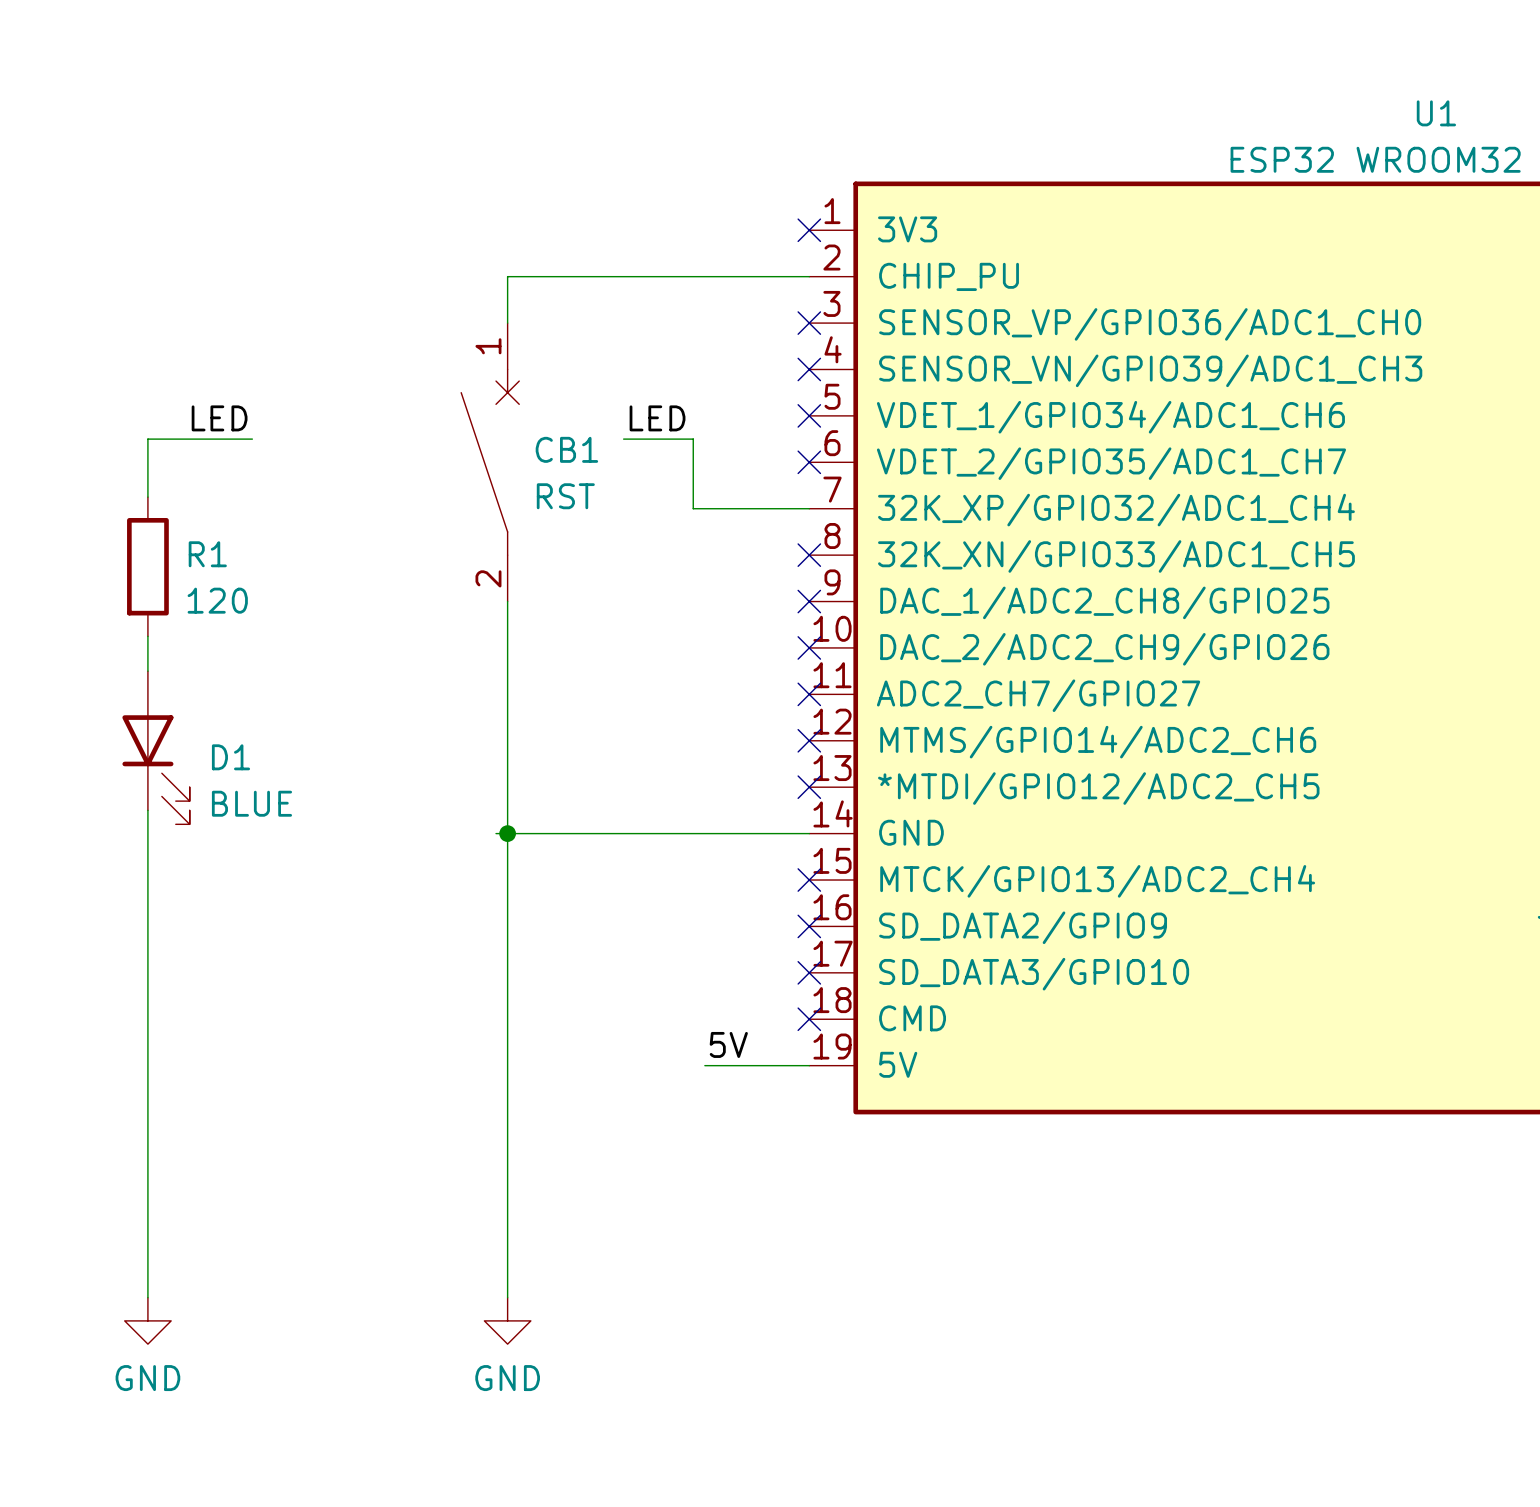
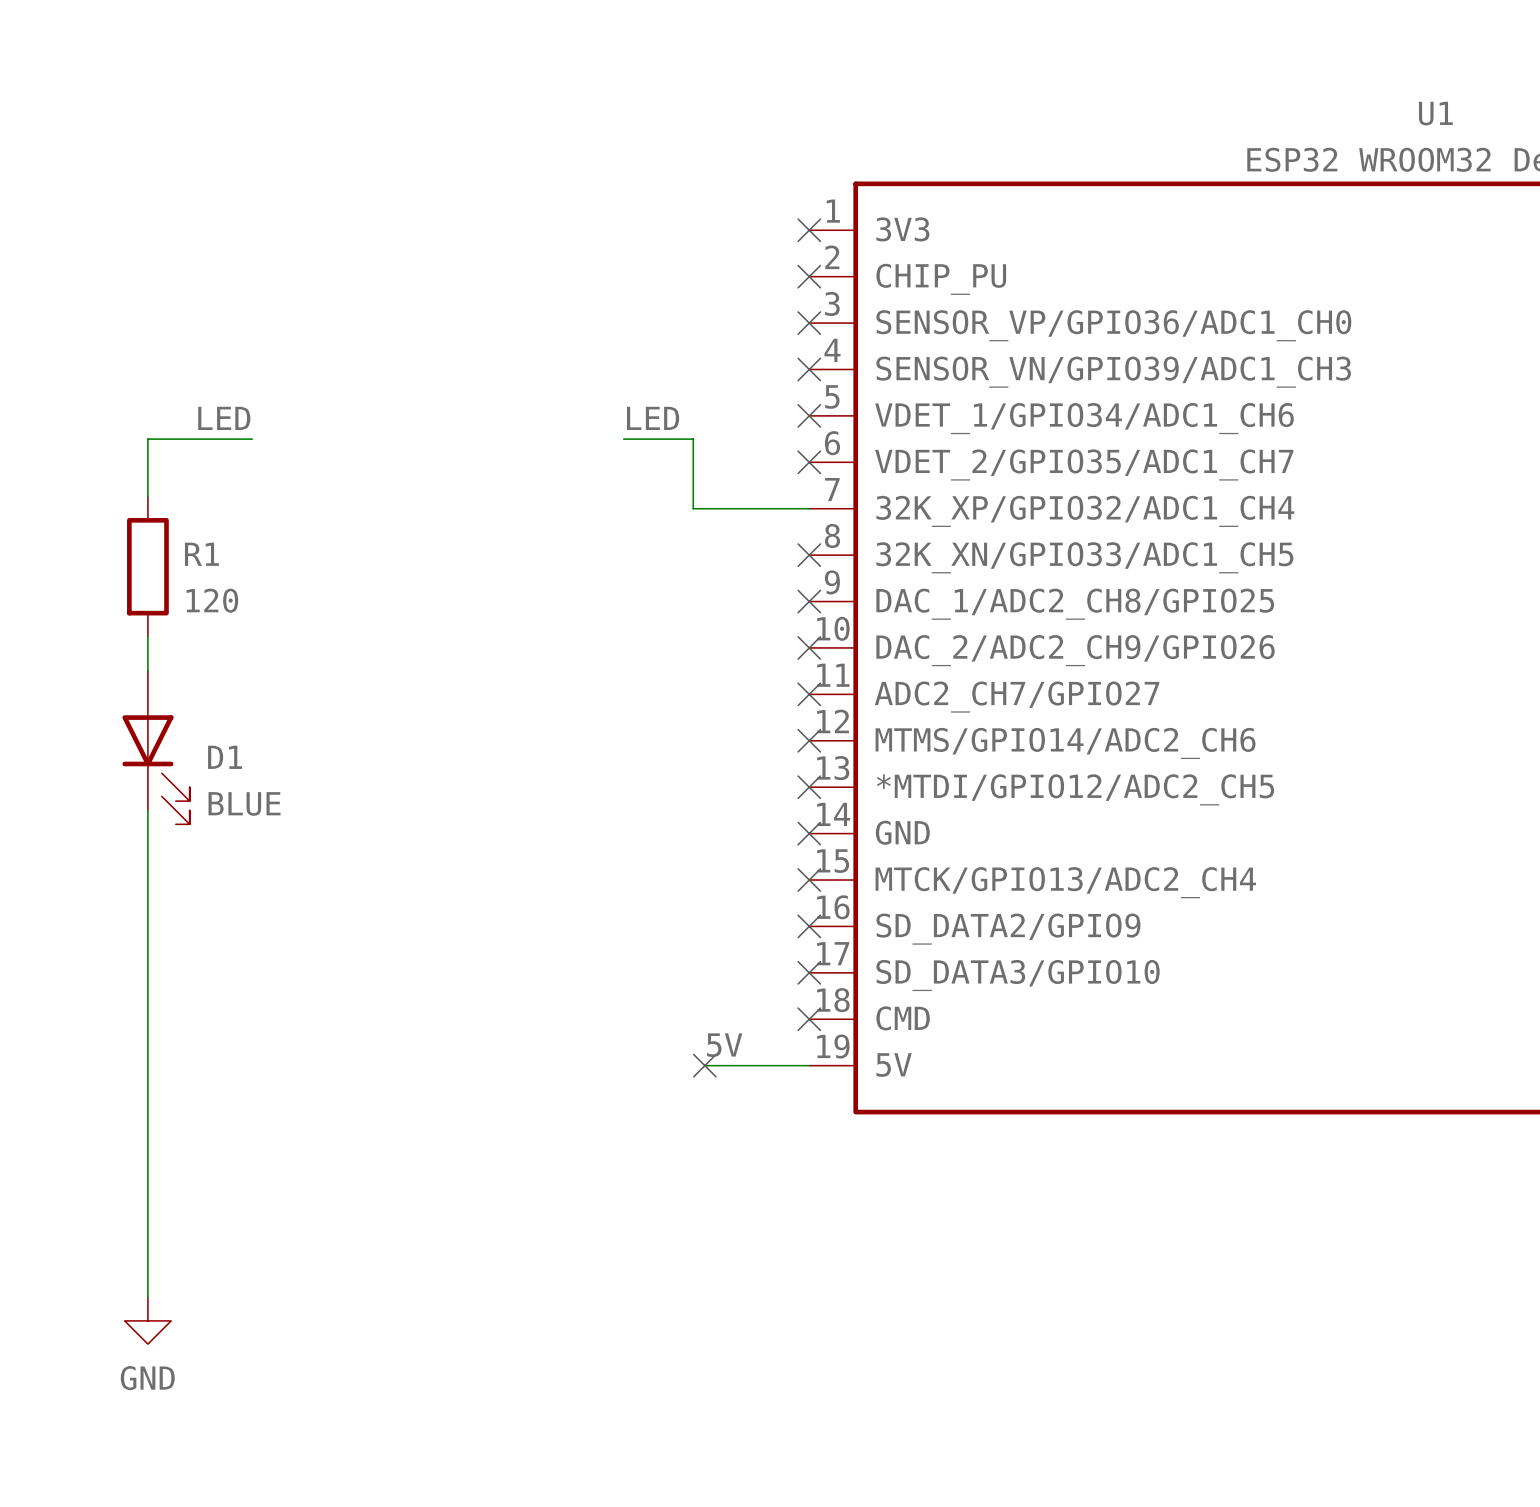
wire: (809, 276) (507, 276) (507, 323) -> none
no-connect mark: none -> (809, 276)
CB1: RST (490, 462) -> none
wire: (507, 601) (507, 1297) -> none
wire: (496, 833) (809, 833) -> none
junction: (507, 833) -> none
no-connect mark: none -> (809, 833)
no-connect mark: none -> (704, 1065)
power symbol: GND (507, 1320) -> none

